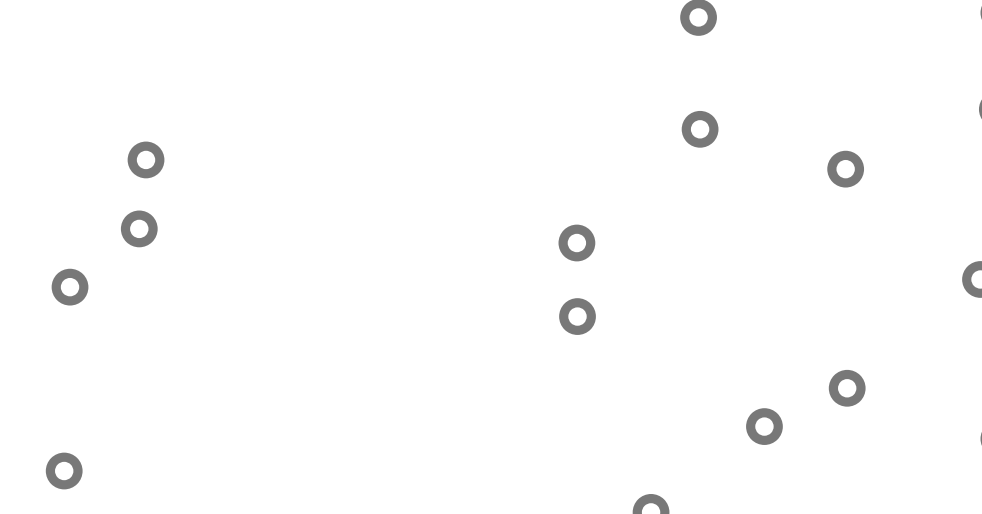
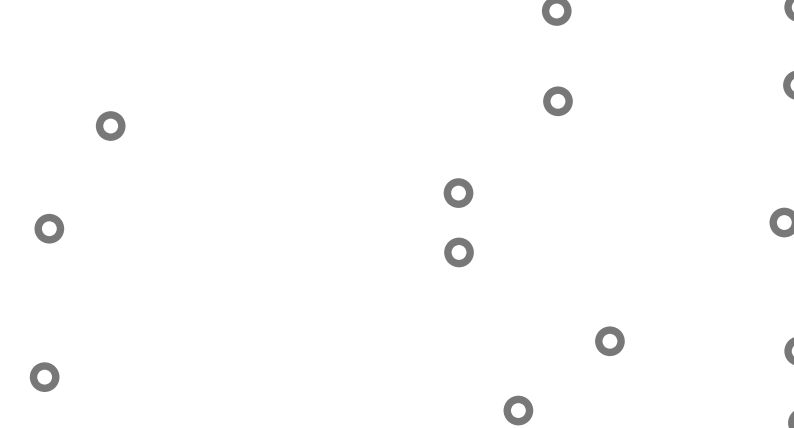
via: (845, 169) -> none
via: (139, 228) -> none
via: (847, 388) -> none

